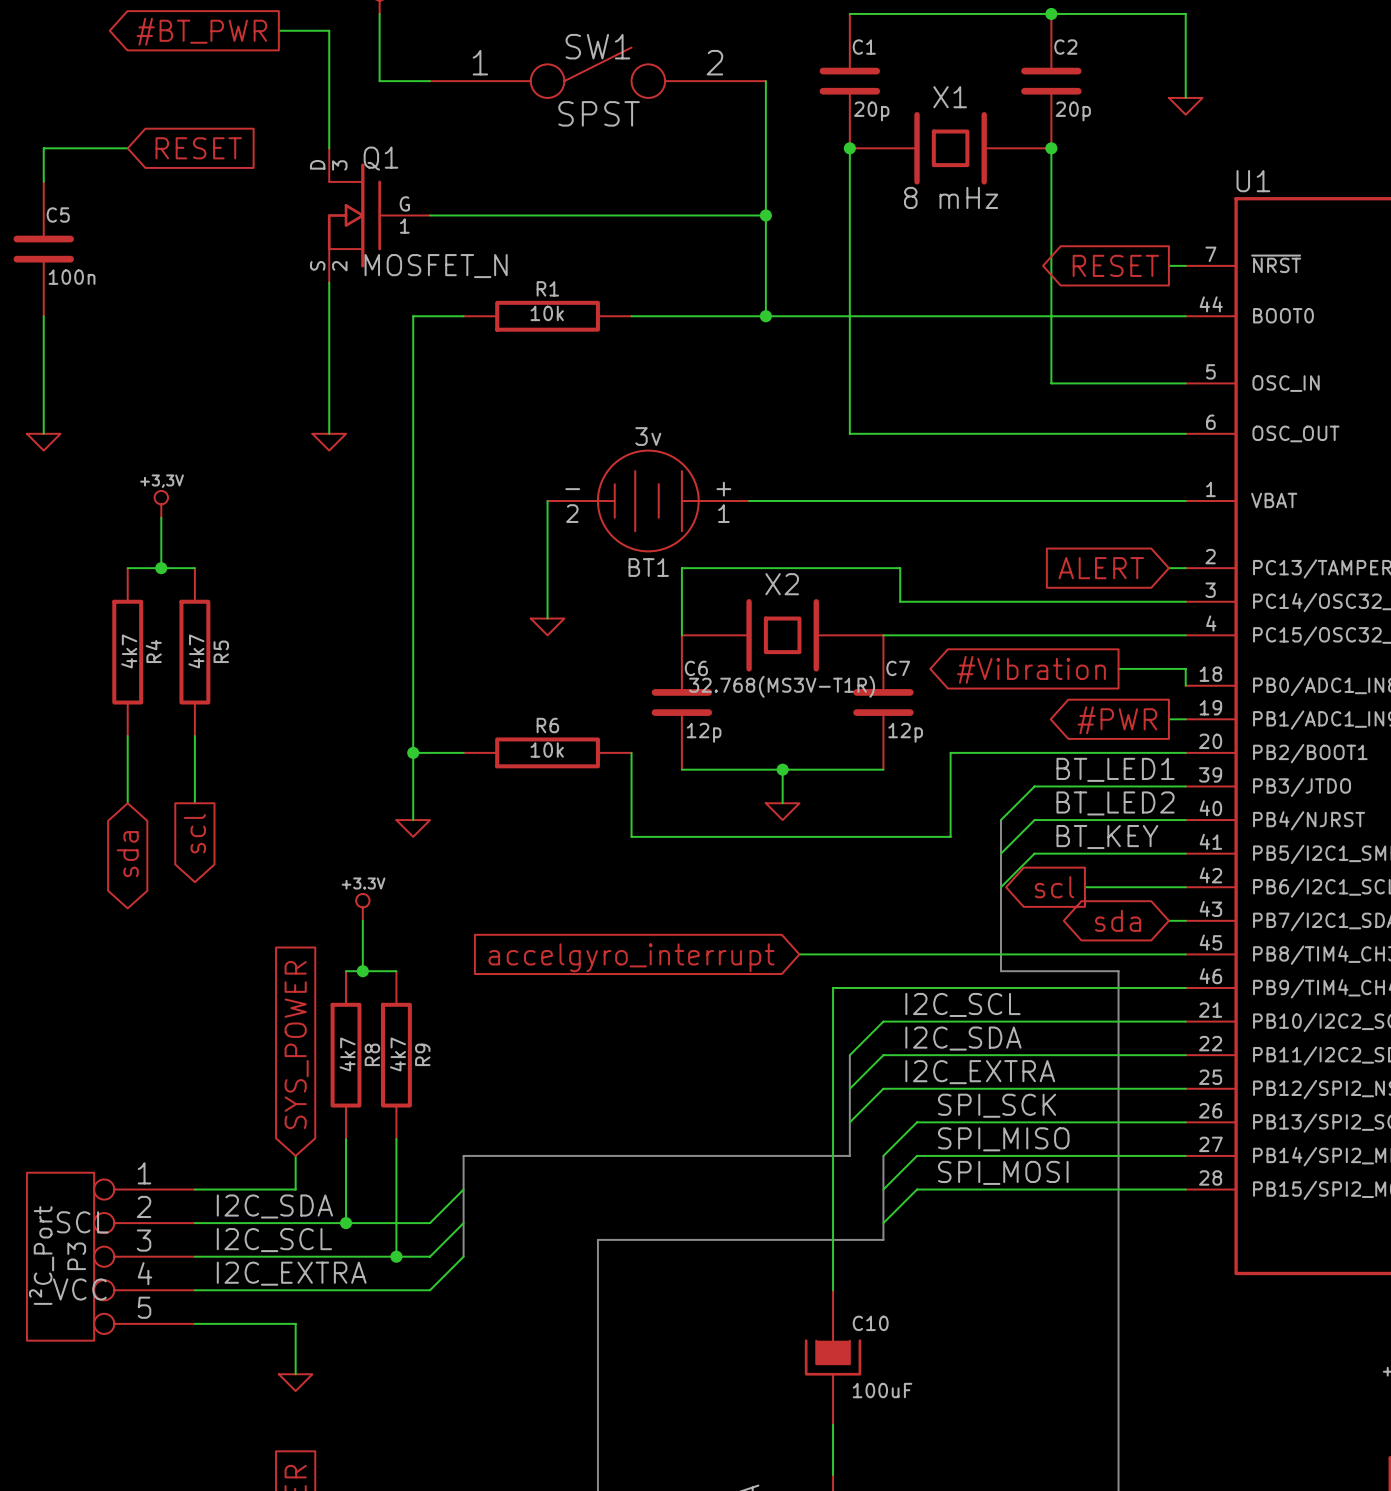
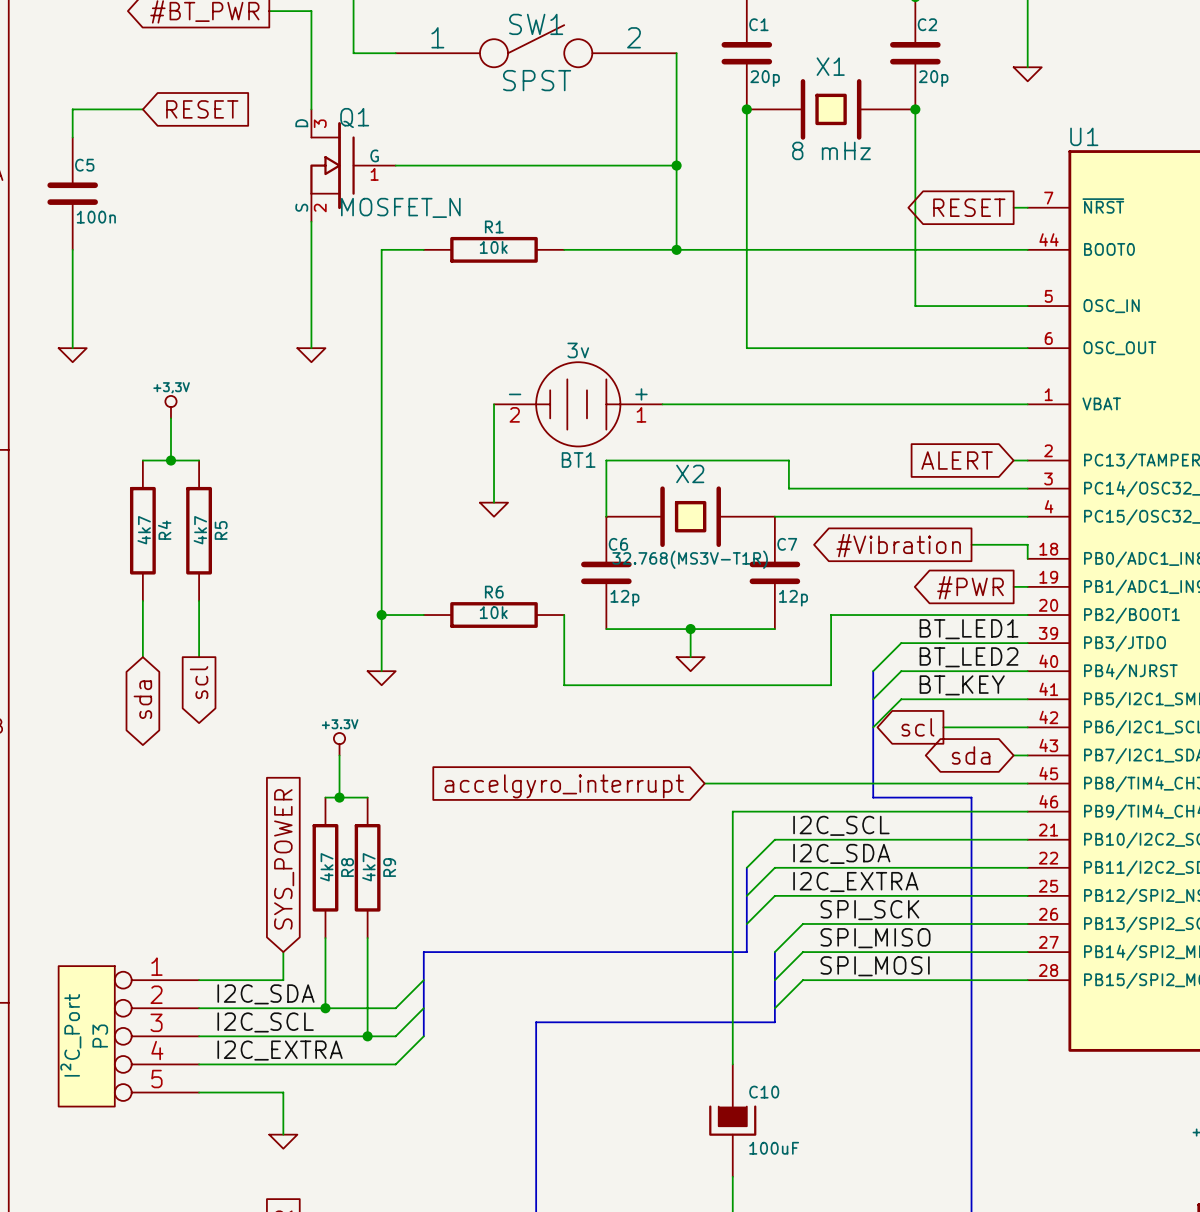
label: SCL (82, 1222) -> none
label: VCC (79, 1289) -> none

